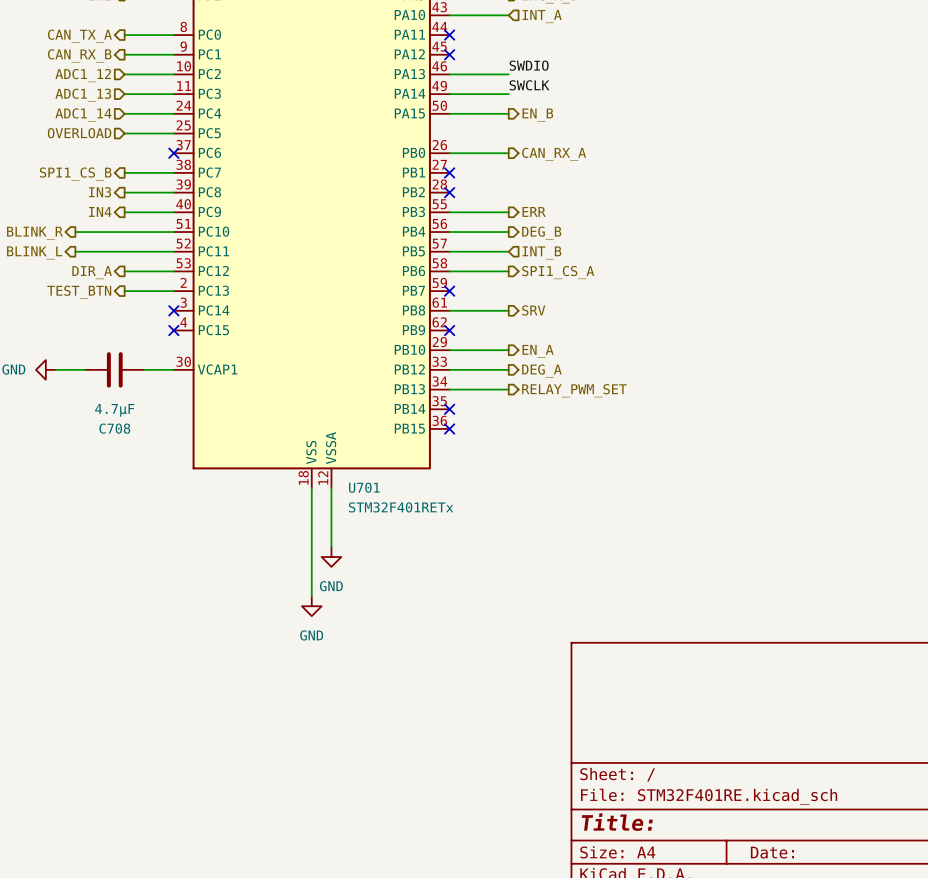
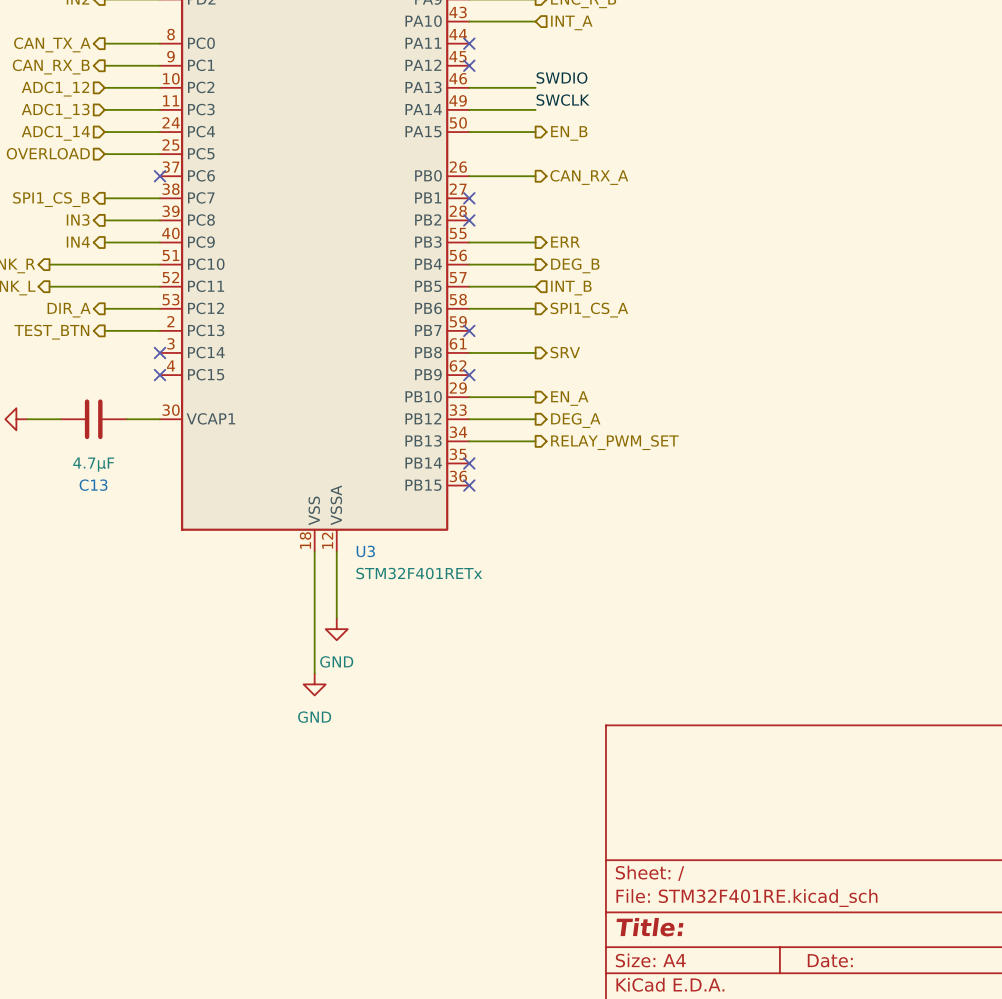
C708 name: C708 (114, 428) -> C13 (93, 485)
U701 name: U701 (364, 487) -> U3 (365, 551)

